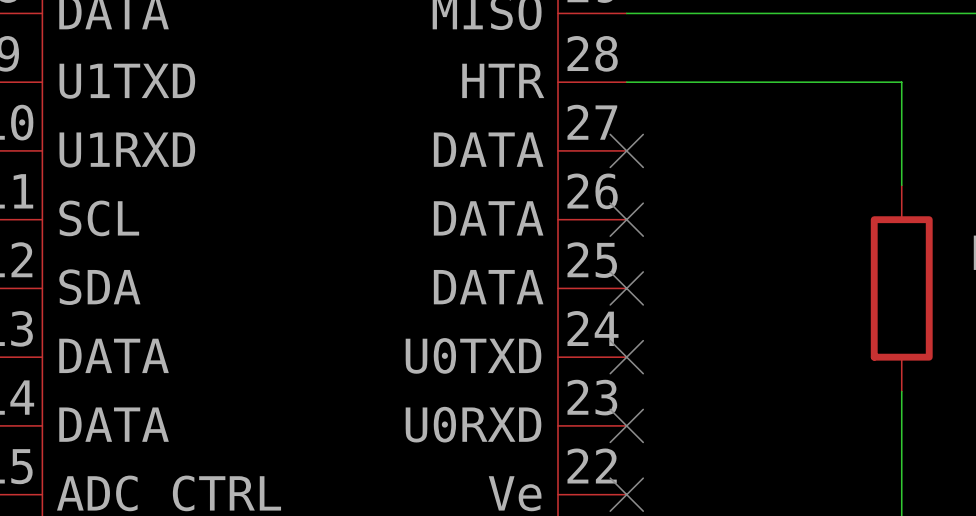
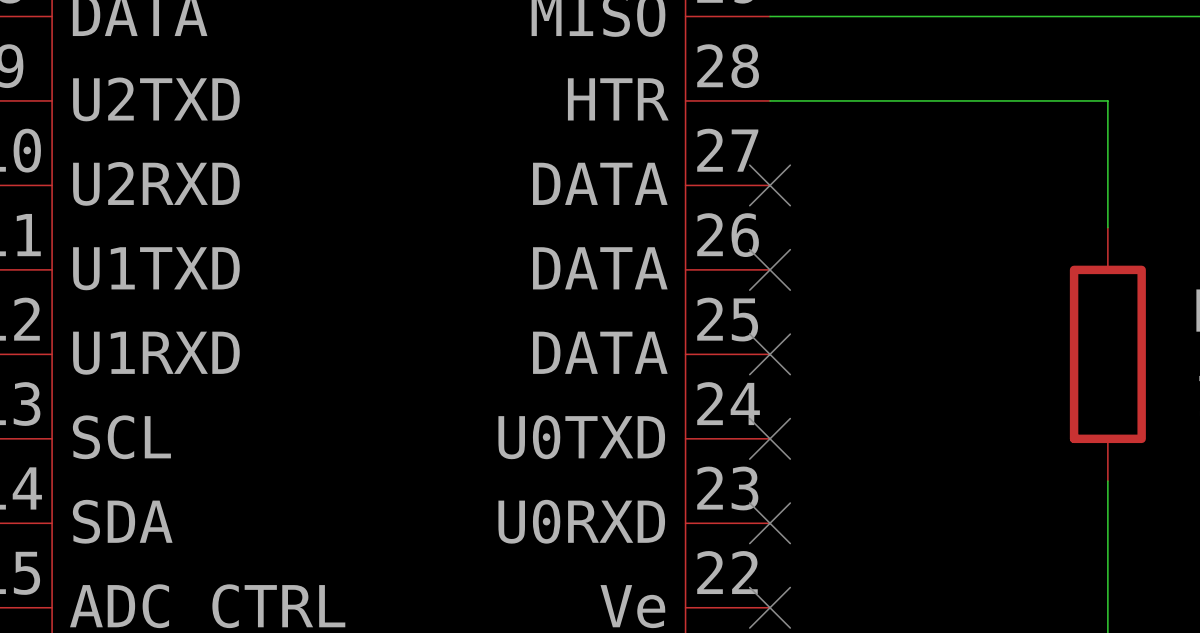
part pin name: U1TXD (127, 81) -> U2TXD (156, 99)
part pin name: U1RXD (127, 149) -> U2RXD (156, 183)
part pin name: SCL (99, 218) -> U1TXD (156, 268)
part pin name: SDA (99, 287) -> U1RXD (156, 353)
part pin name: DATA (114, 355) -> SCL (121, 437)
part pin name: DATA (114, 424) -> SDA (122, 521)

